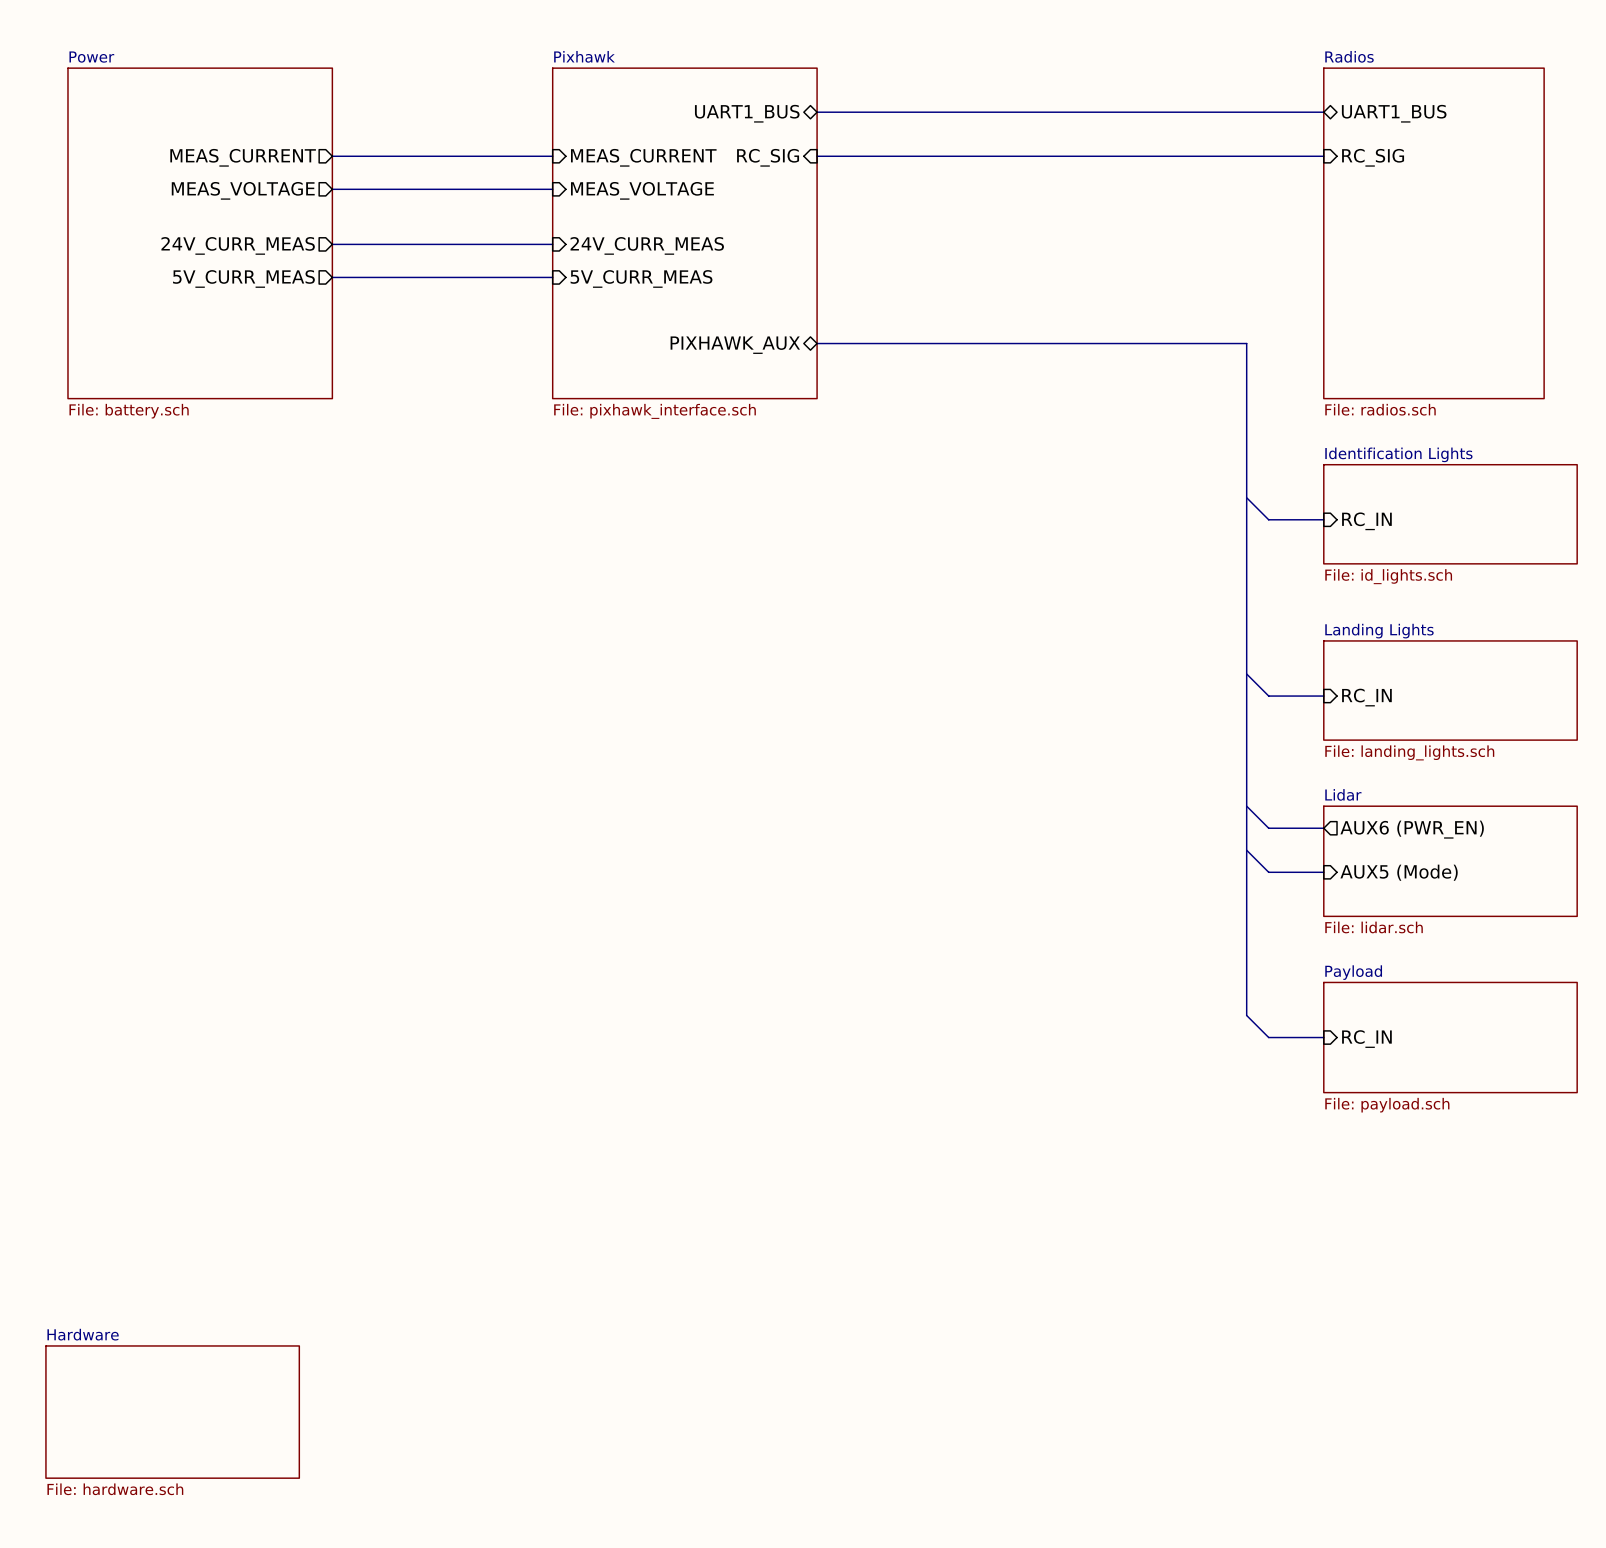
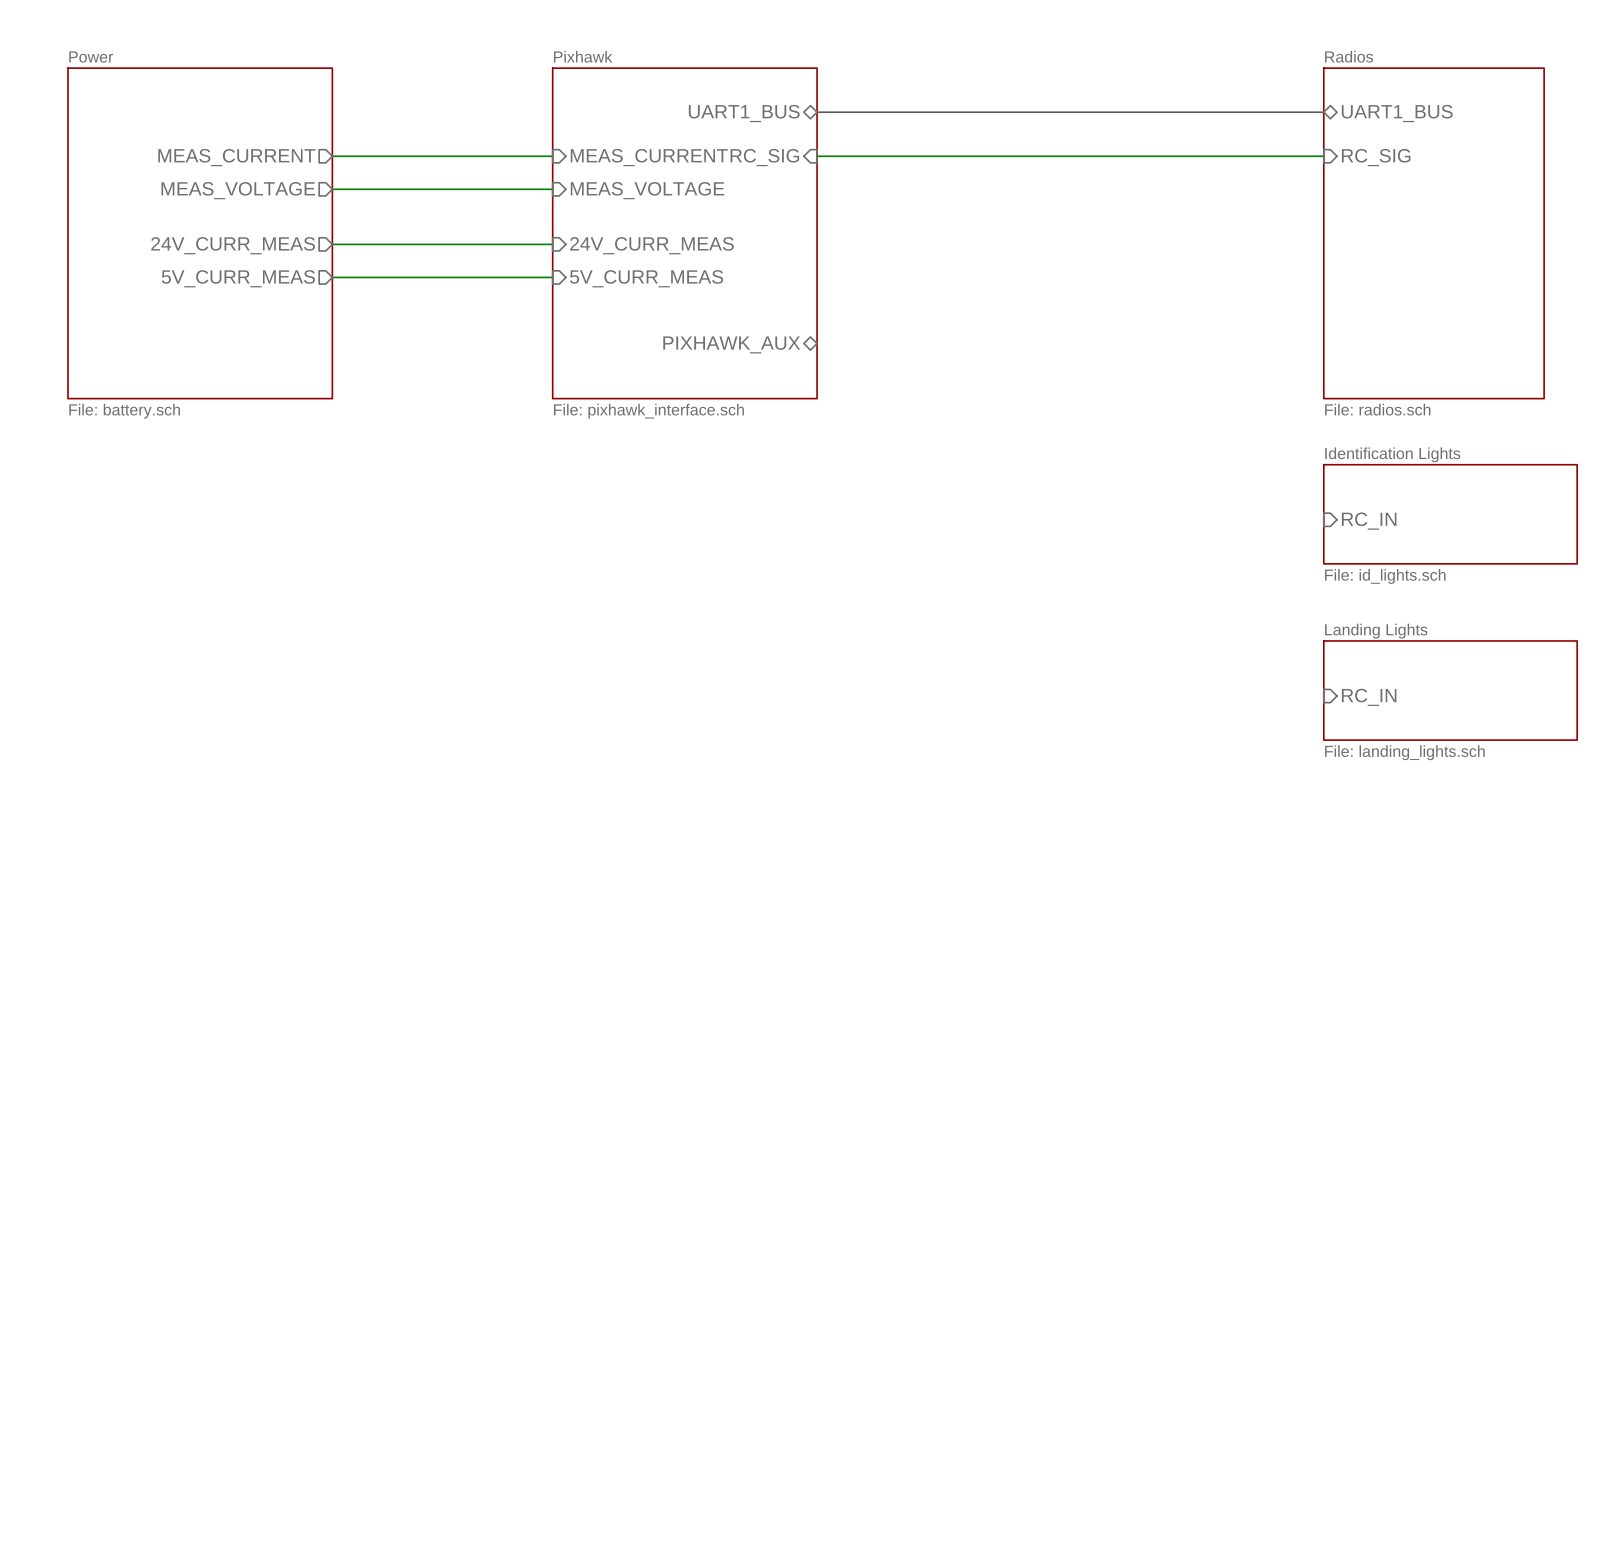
bus: (817, 343) (1246, 343) (1246, 1015) -> none
wire: (1246, 497) (1268, 519) (1323, 519) -> none
wire: (1246, 674) (1268, 696) (1323, 696) -> none
wire: (1246, 806) (1268, 828) (1323, 828) -> none
sheet pin: AUX6 (PWR_EN) (1412, 829) -> none
wire: (1246, 850) (1268, 872) (1323, 872) -> none
sheet Lidar: File: lidar.sch (1450, 861) -> none
sheet pin: AUX5 (Mode) (1399, 872) -> none
wire: (1246, 1015) (1268, 1037) (1323, 1037) -> none
sheet Payload: File: payload.sch (1450, 1037) -> none
sheet pin: RC_IN (1366, 1039) -> none
sheet Hardware: File: hardware.sch (172, 1412) -> none

